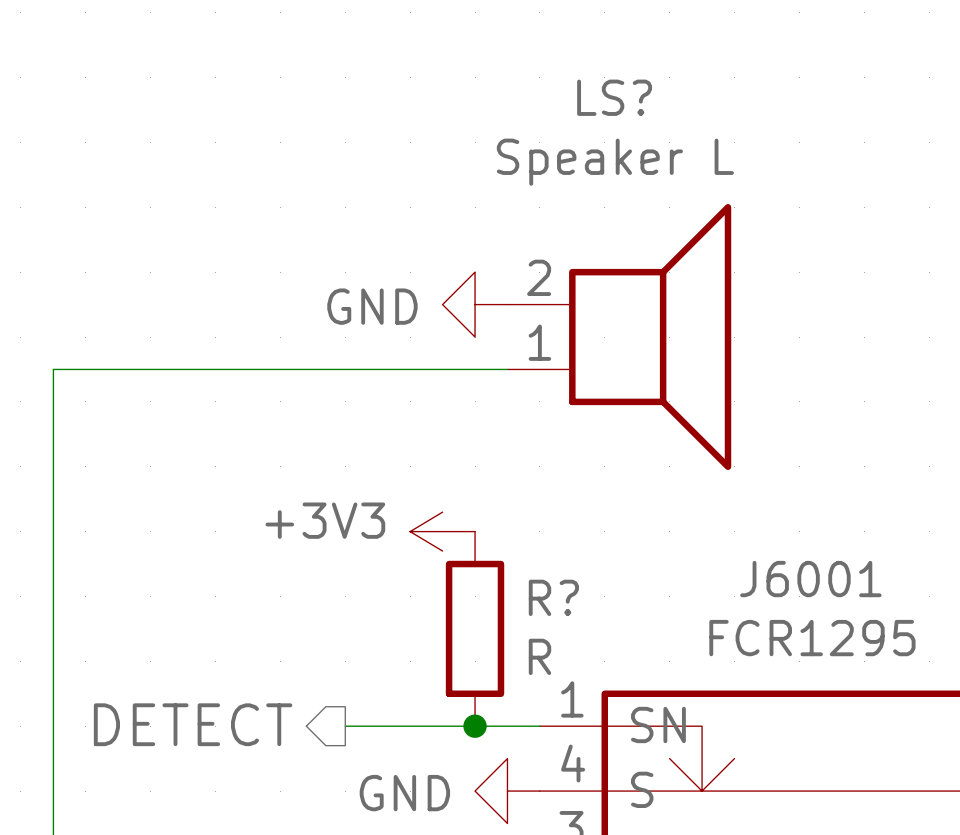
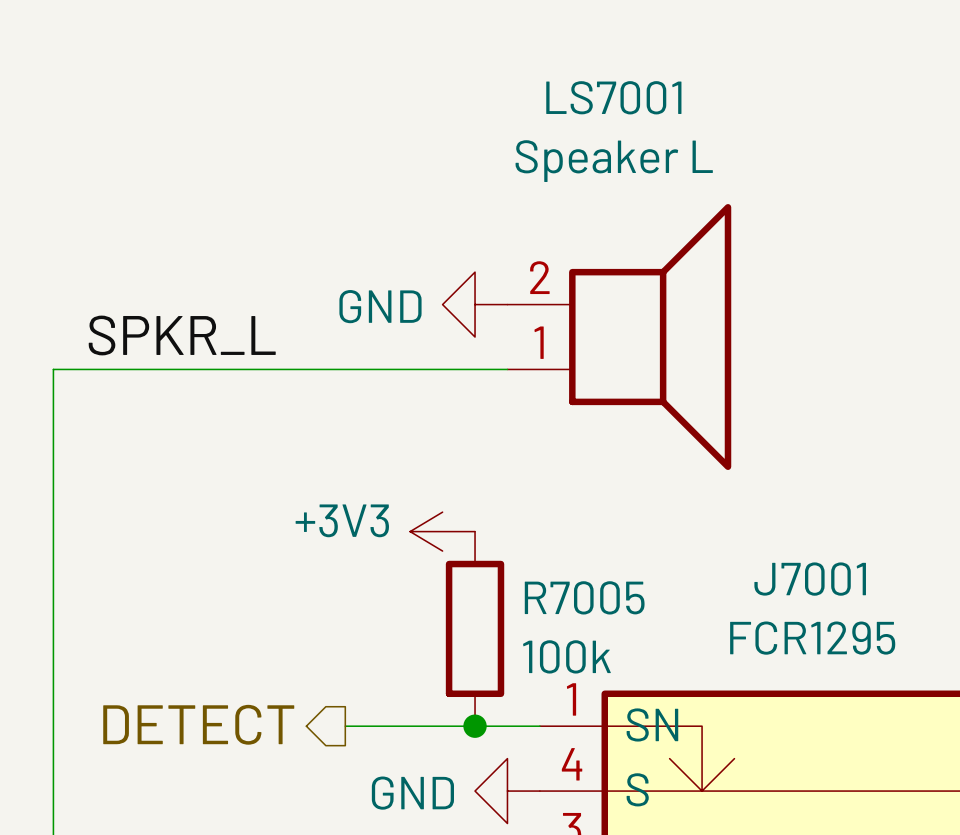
LS? name: LS? (614, 97) -> LS7001 (613, 97)
label: none -> SPKR_L (182, 335)
J6001 name: J6001 (810, 579) -> J7001 (810, 579)
R? name: R? (553, 597) -> R7005 (584, 597)
R? value: R (539, 656) -> 100k (566, 656)

